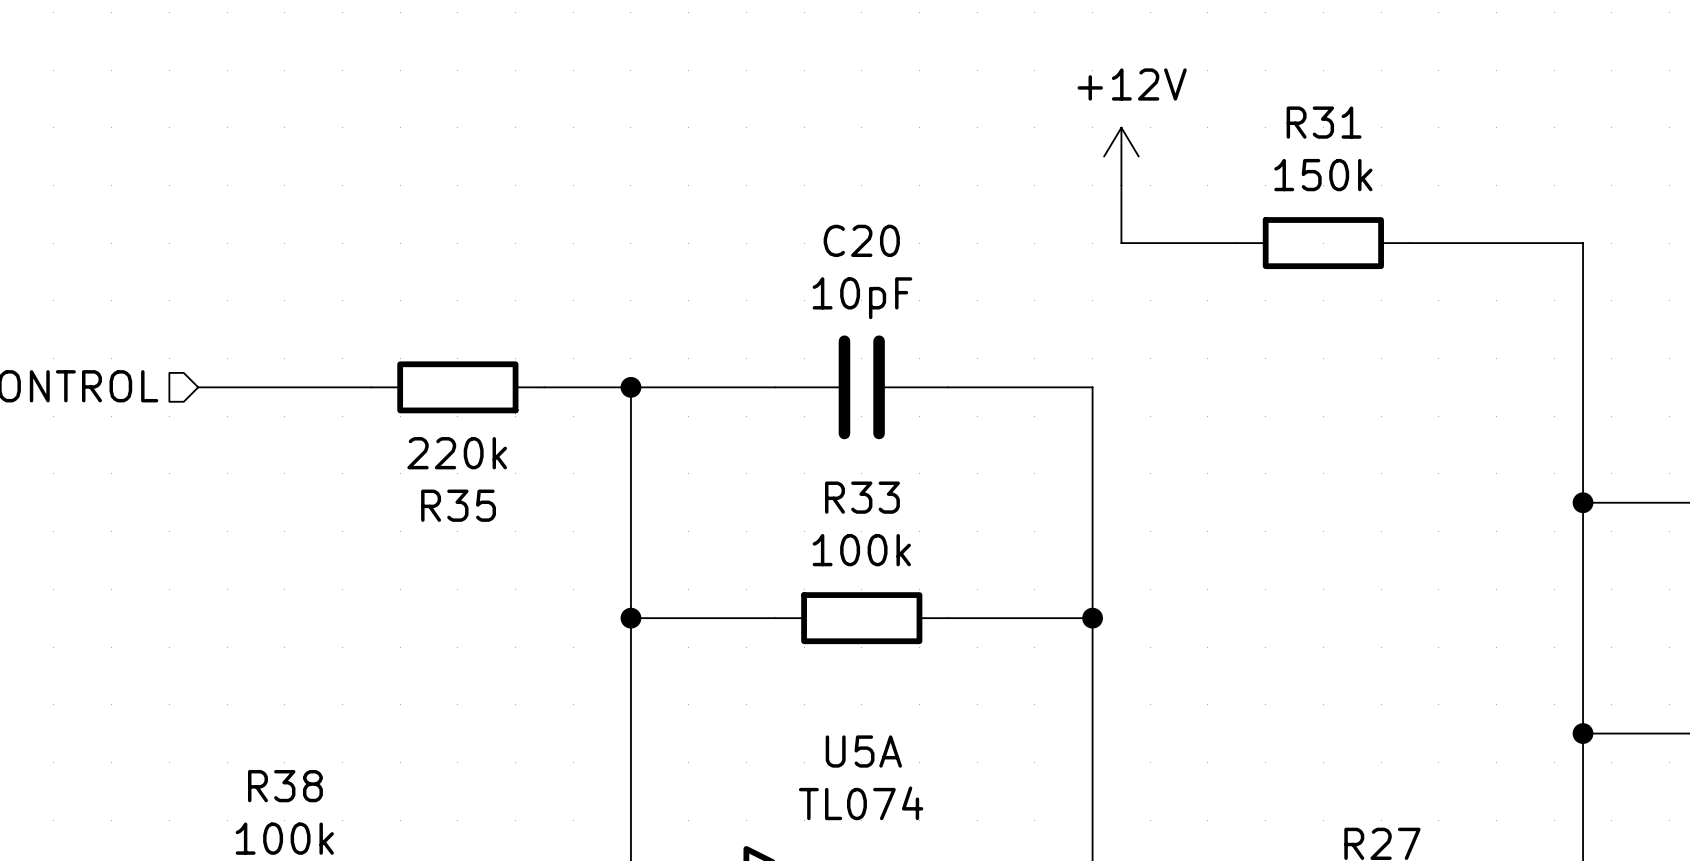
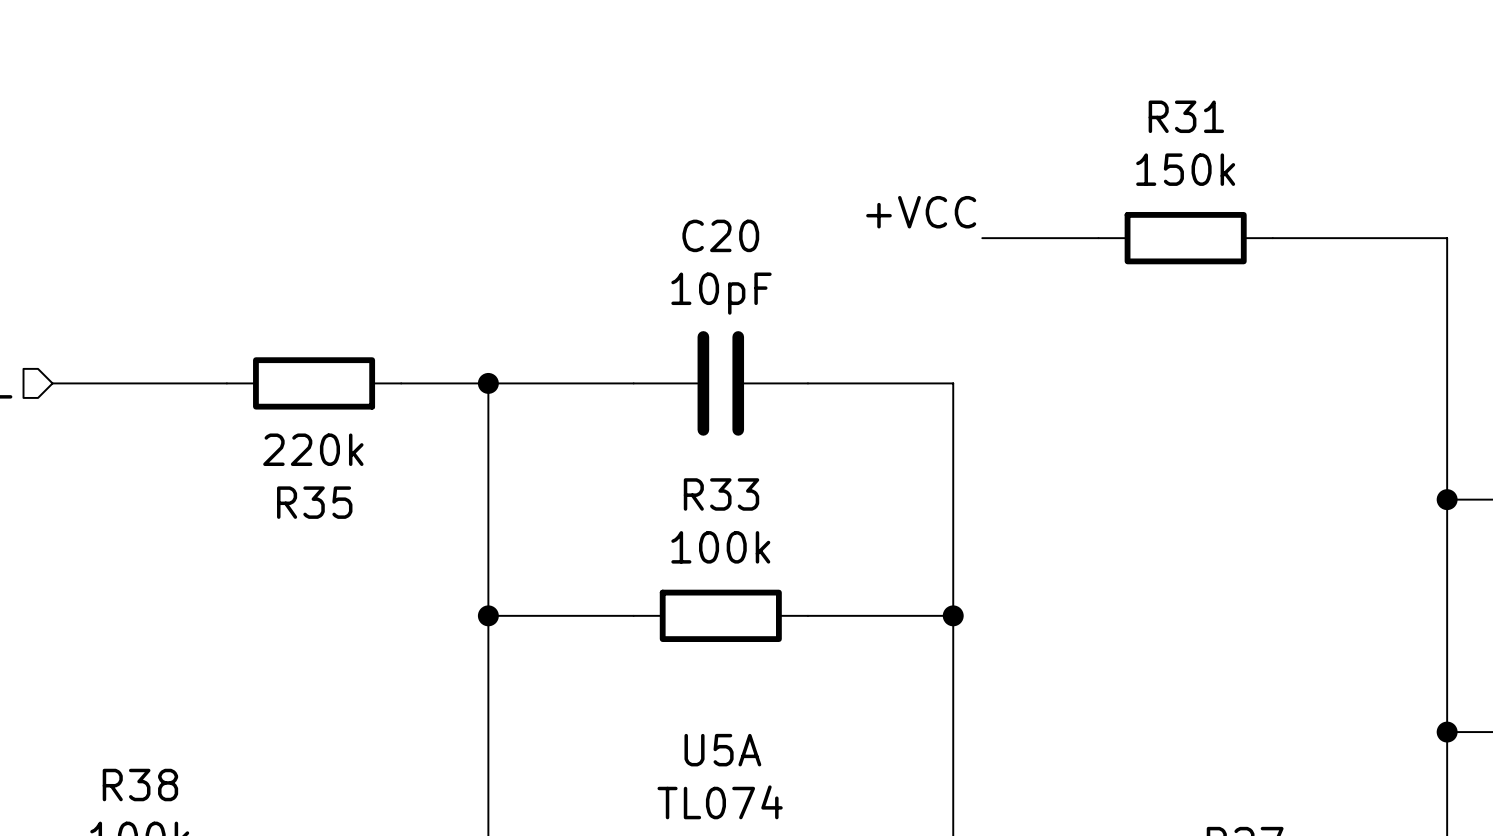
power symbol: +12V (1121, 156) -> none
wire: (1121, 185) (1121, 243) -> none
label: none -> +VCC (921, 212)

